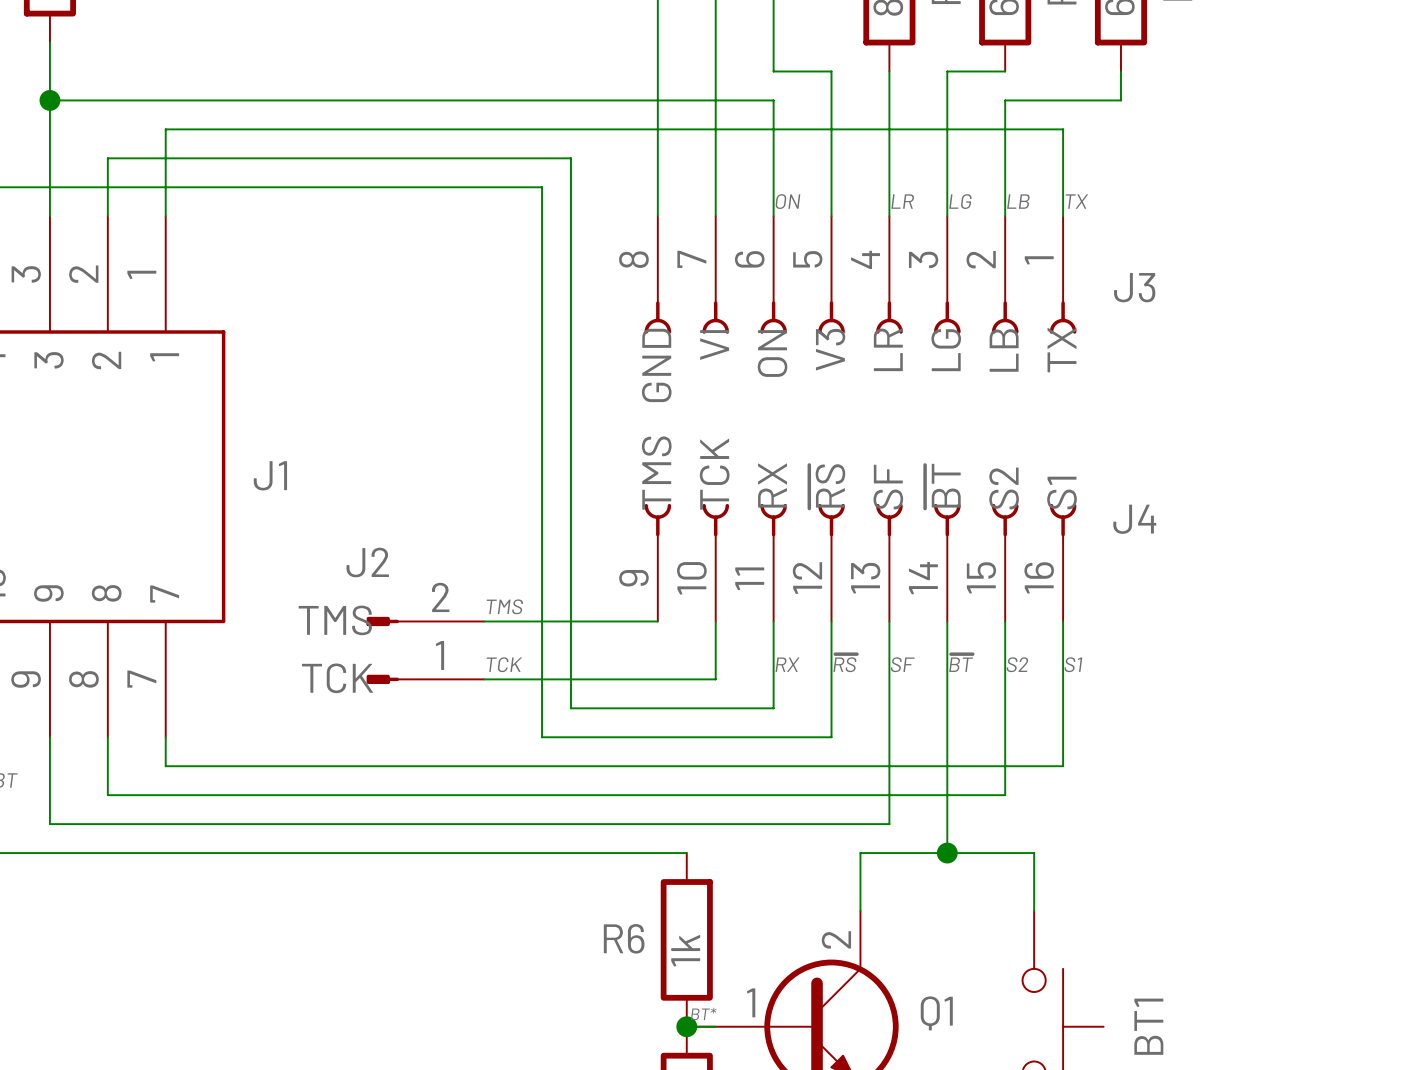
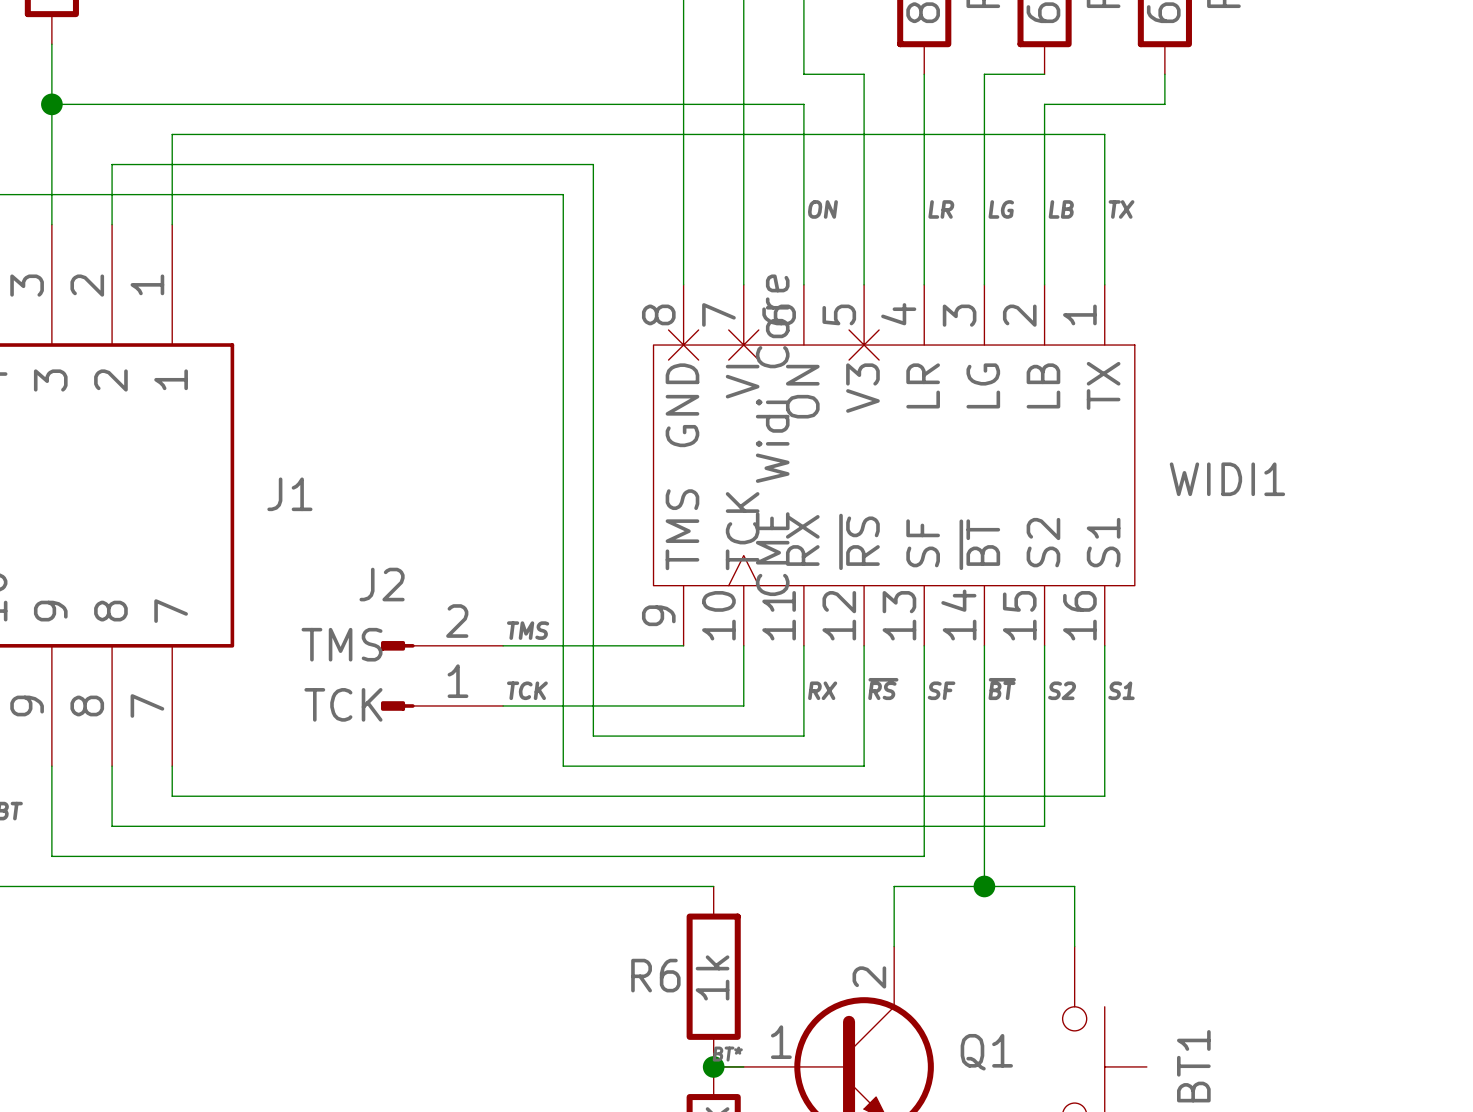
J3: (860, 274) -> none
WIDI1: none -> CME Widi Core (894, 465)
J4: (860, 562) -> none

